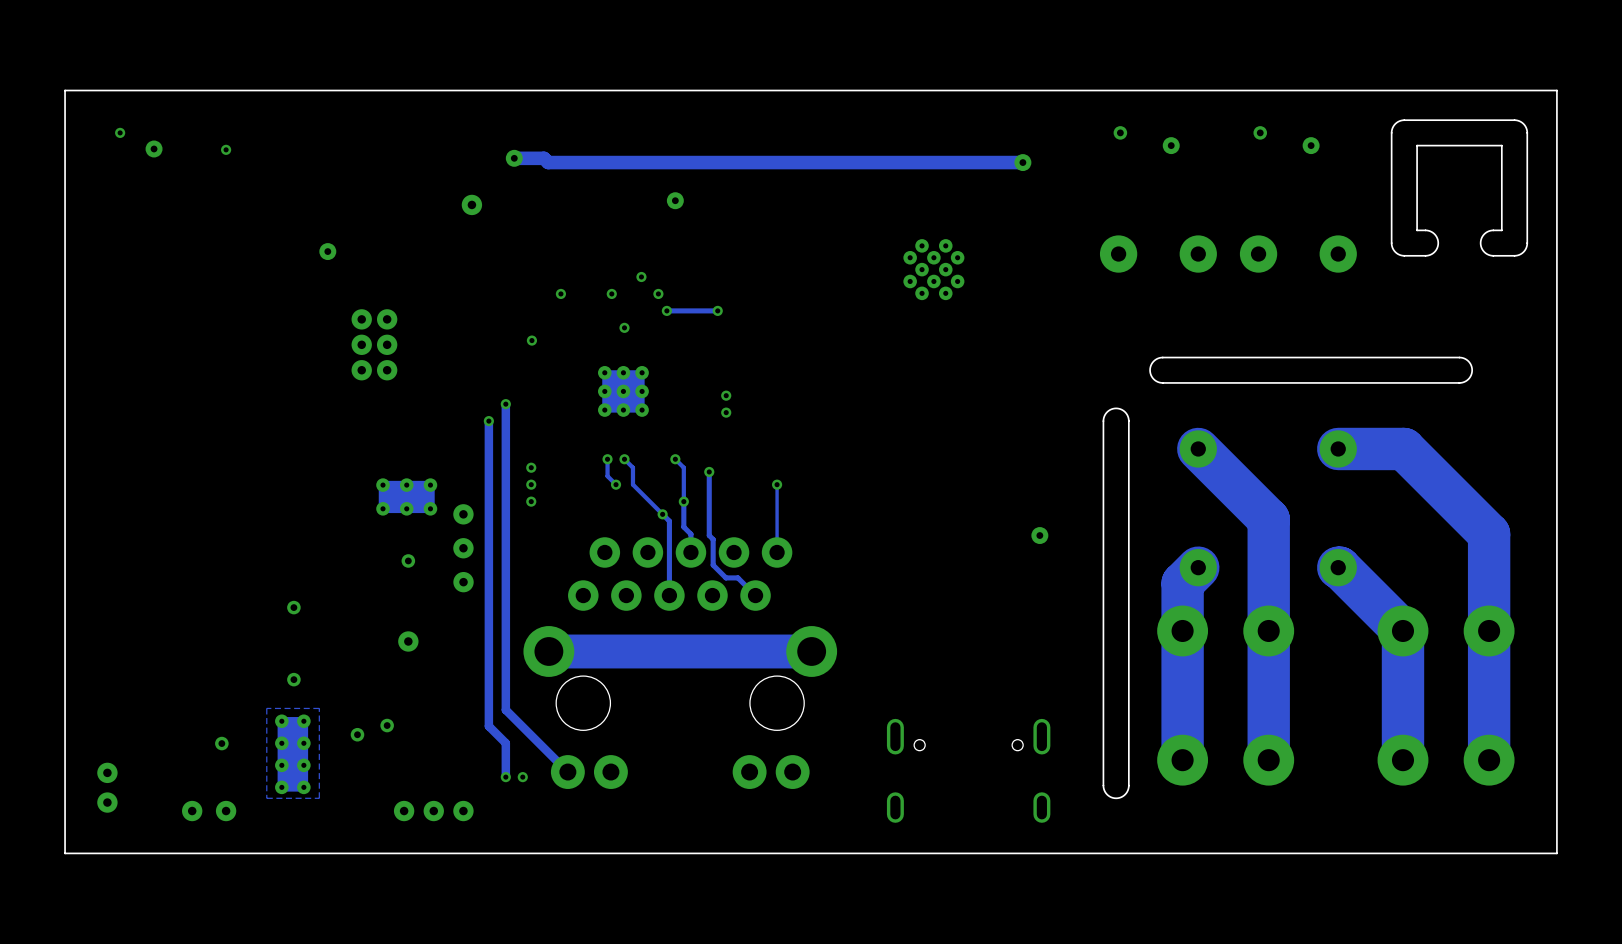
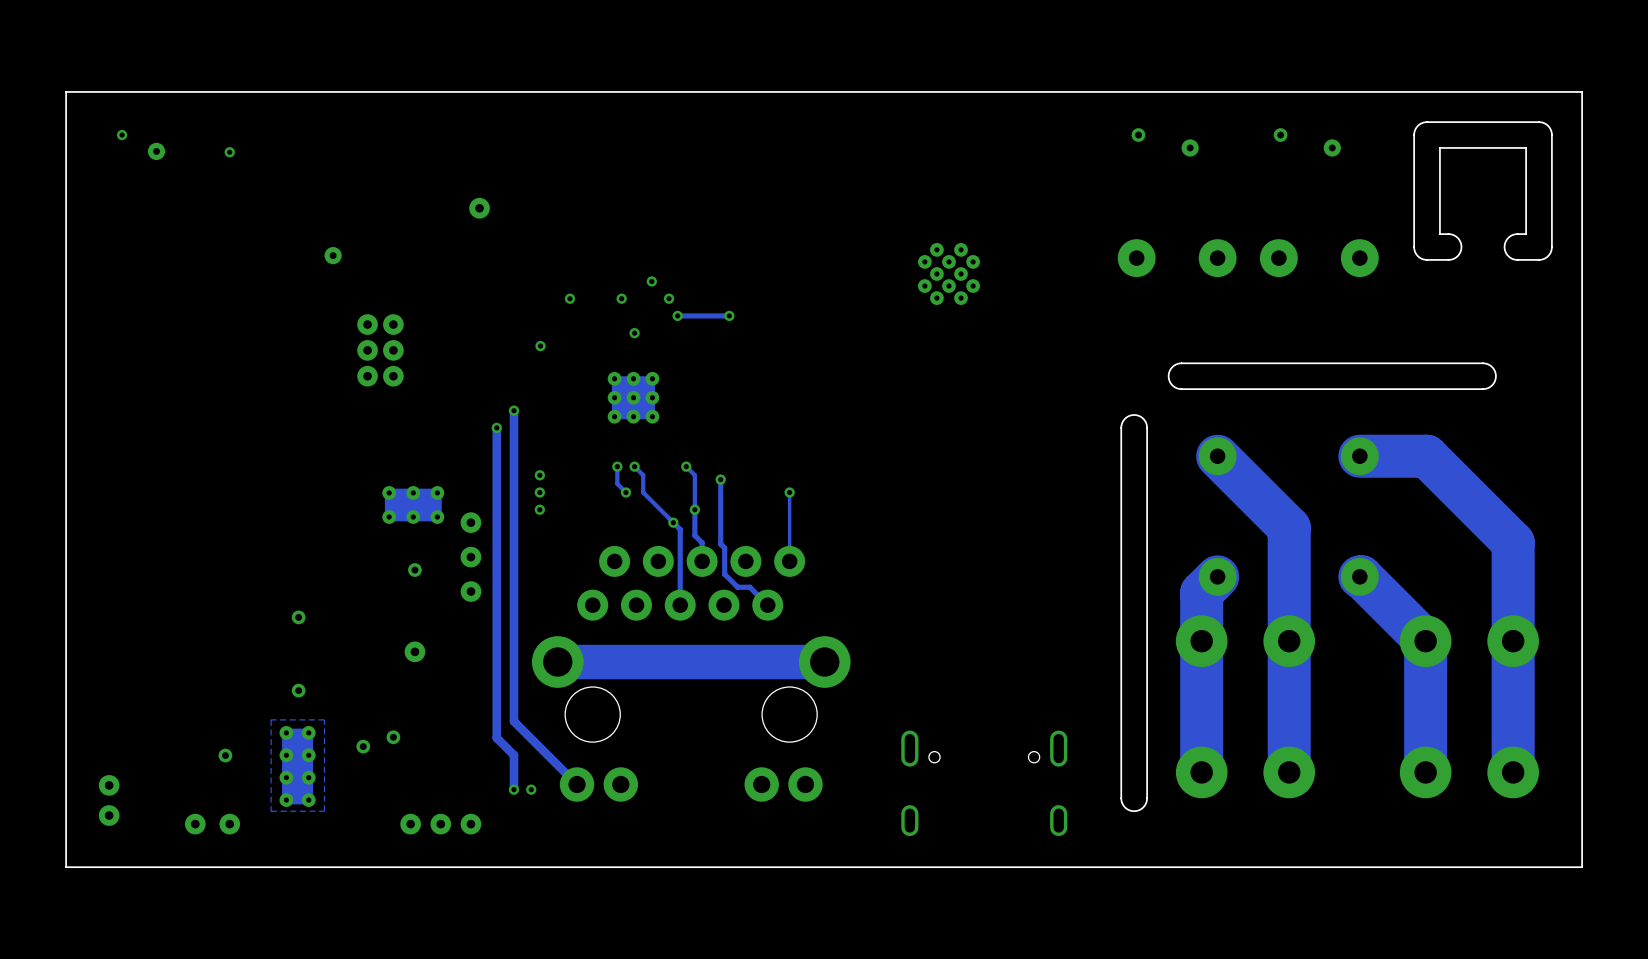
track: (514, 158) (543, 158) (548, 162) (1022, 162) -> none
via: (514, 158) -> none
via: (1022, 162) -> none
via: (675, 200) -> none
via: (726, 395) -> none
via: (726, 412) -> none
via: (1039, 535) -> none

